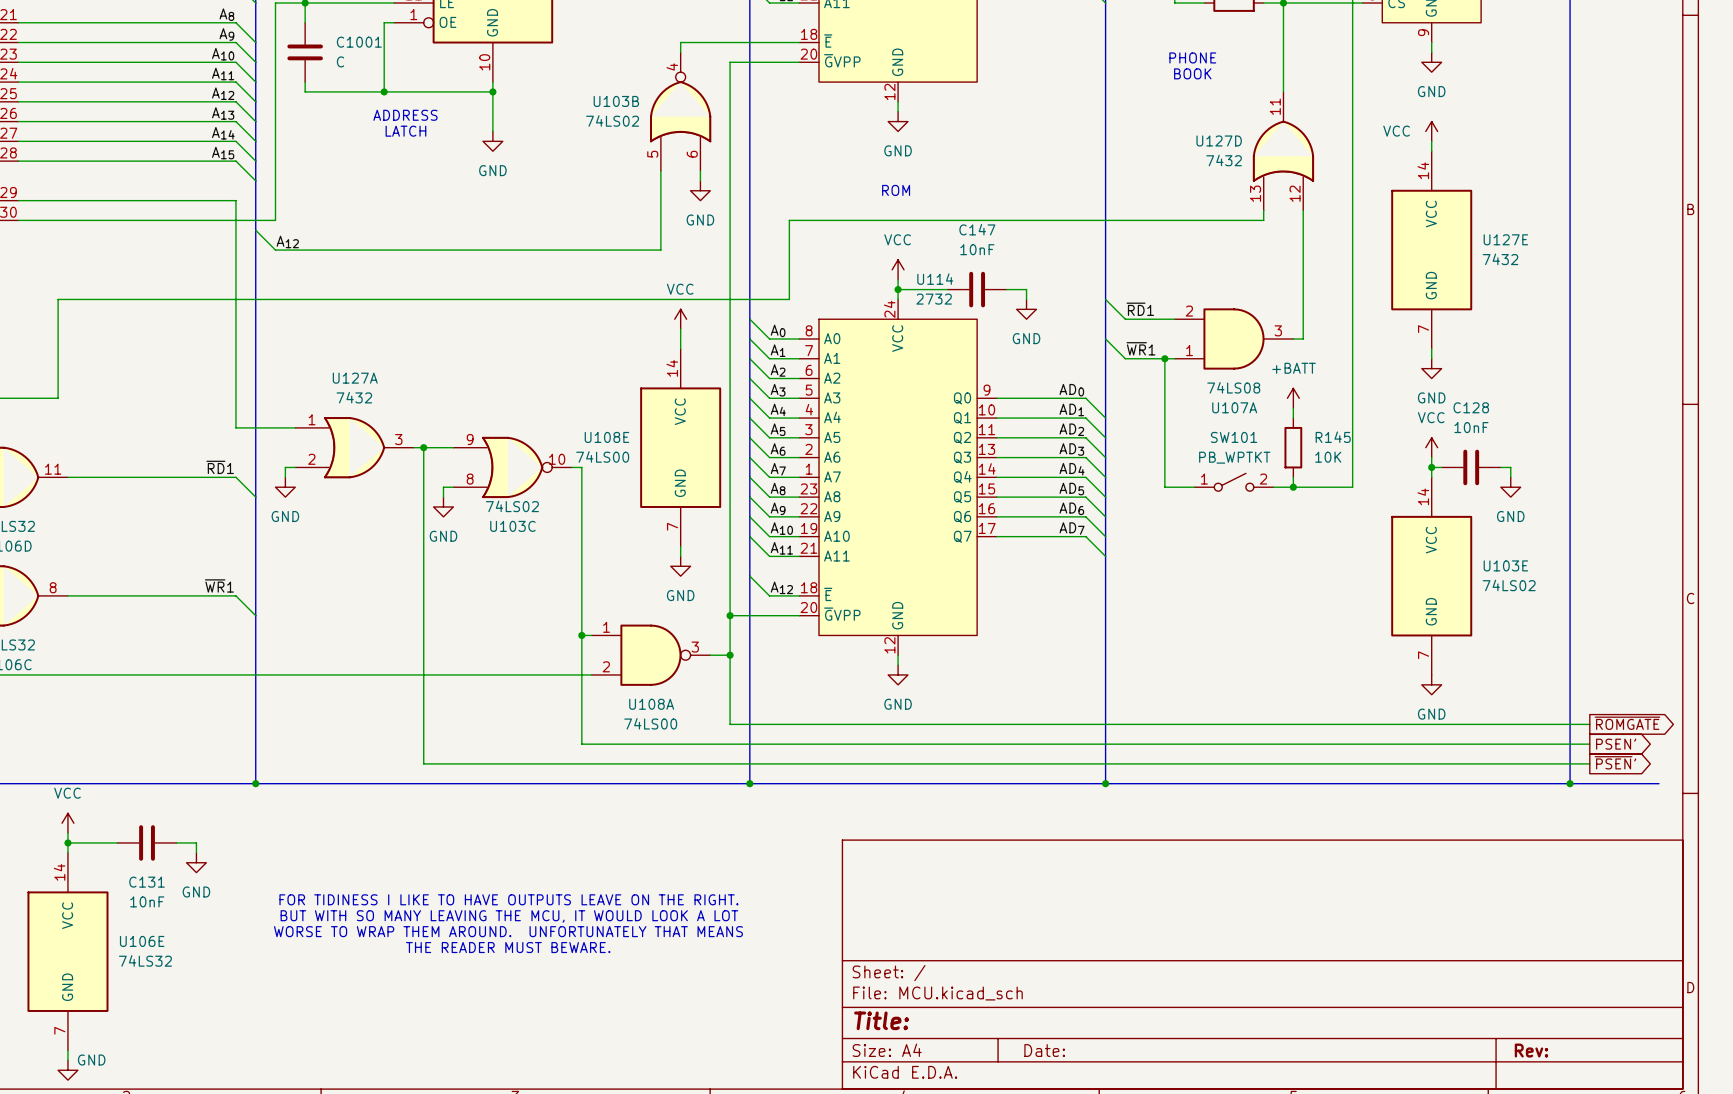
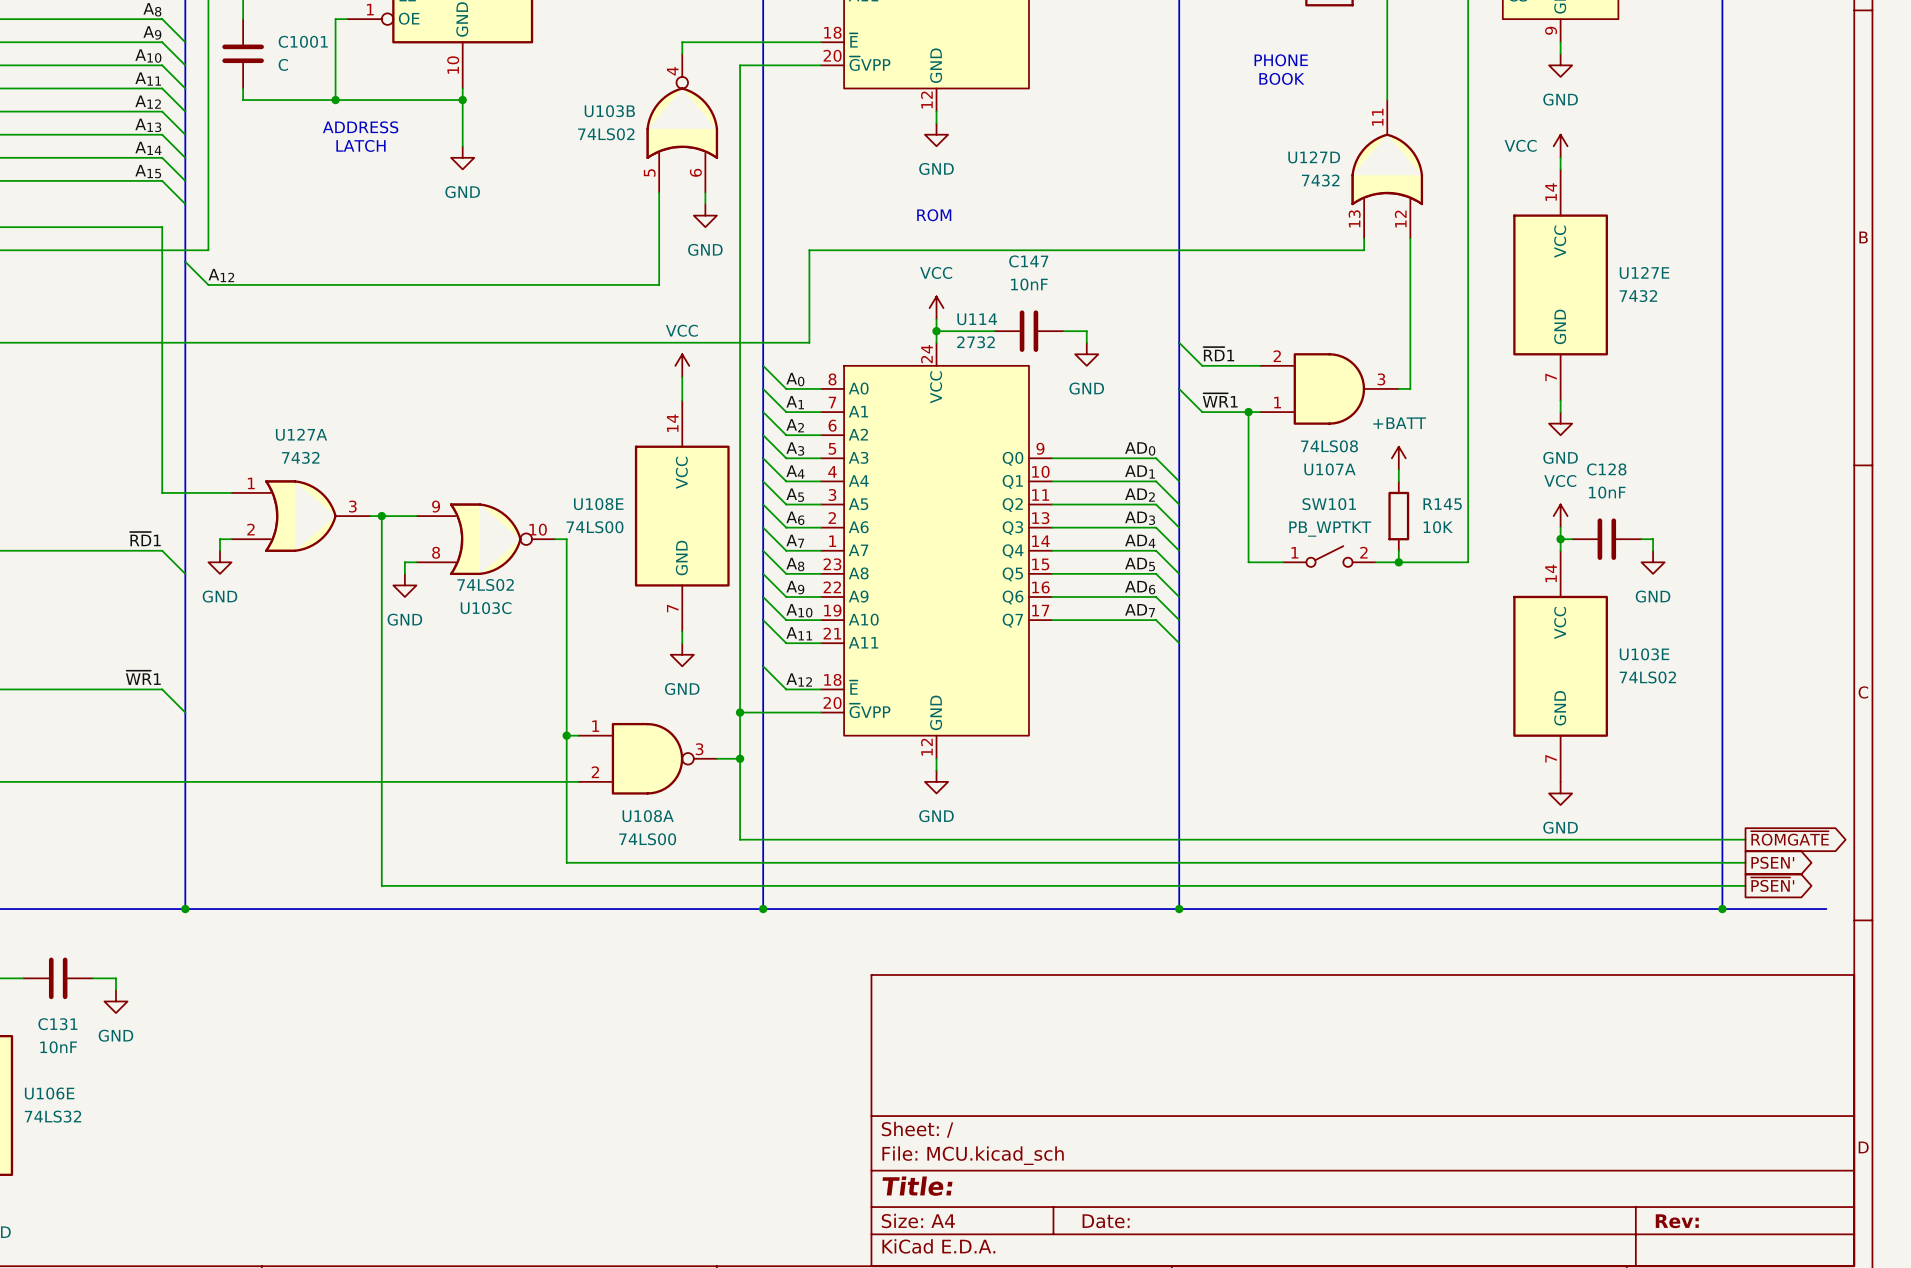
text: FOR TIDINESS I LIKE TO HAVE OUTPUTS LEAVE ON THE RIGHT. (508, 899) -> none
text: BUT WITH SO MANY LEAVING THE MCU, IT WOULD LOOK A LOT (509, 916) -> none
text: WORSE TO WRAP THEM AROUND. UNFORTUNATELY THAT MEANS (508, 931) -> none
text: THE READER MUST BEWARE. (508, 947) -> none

